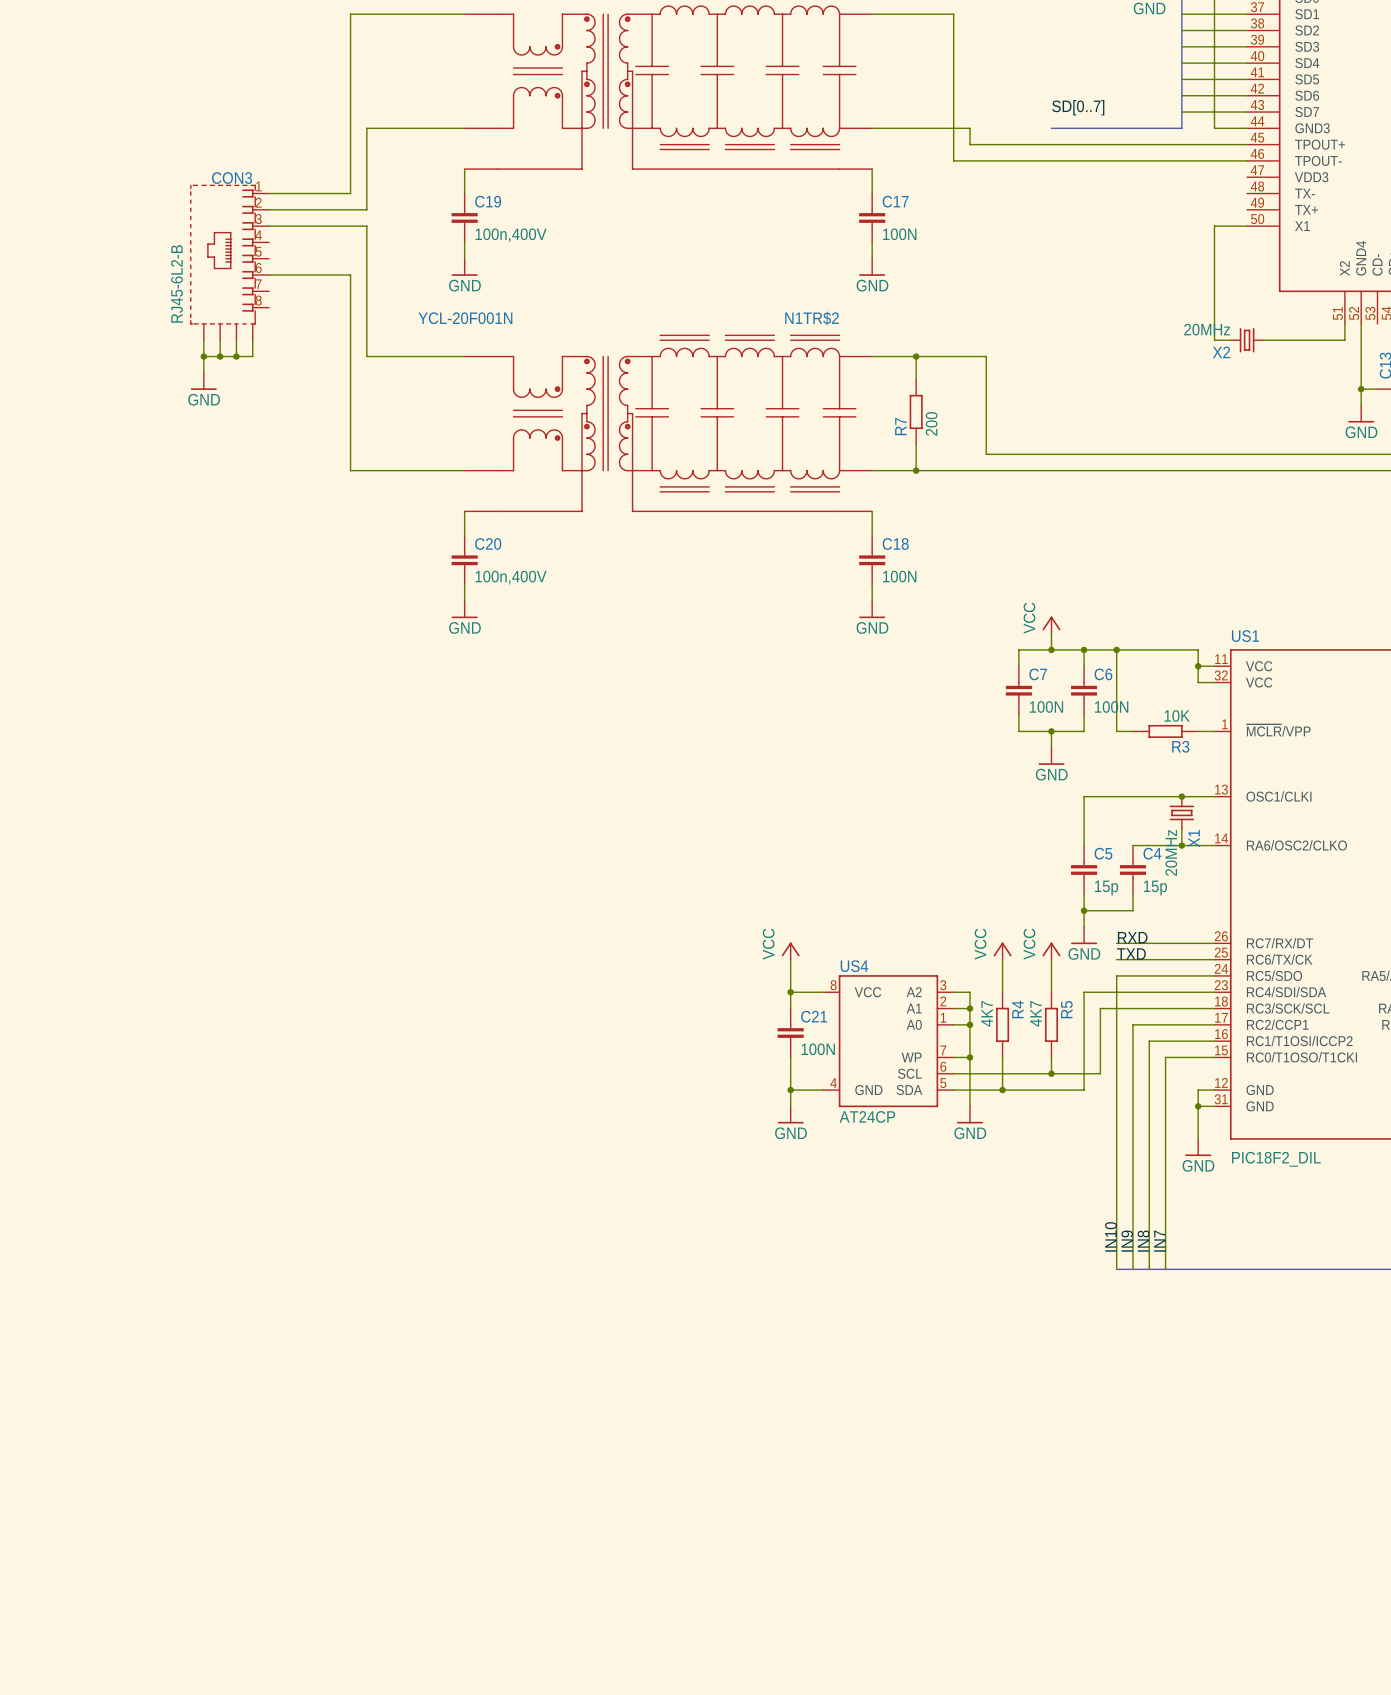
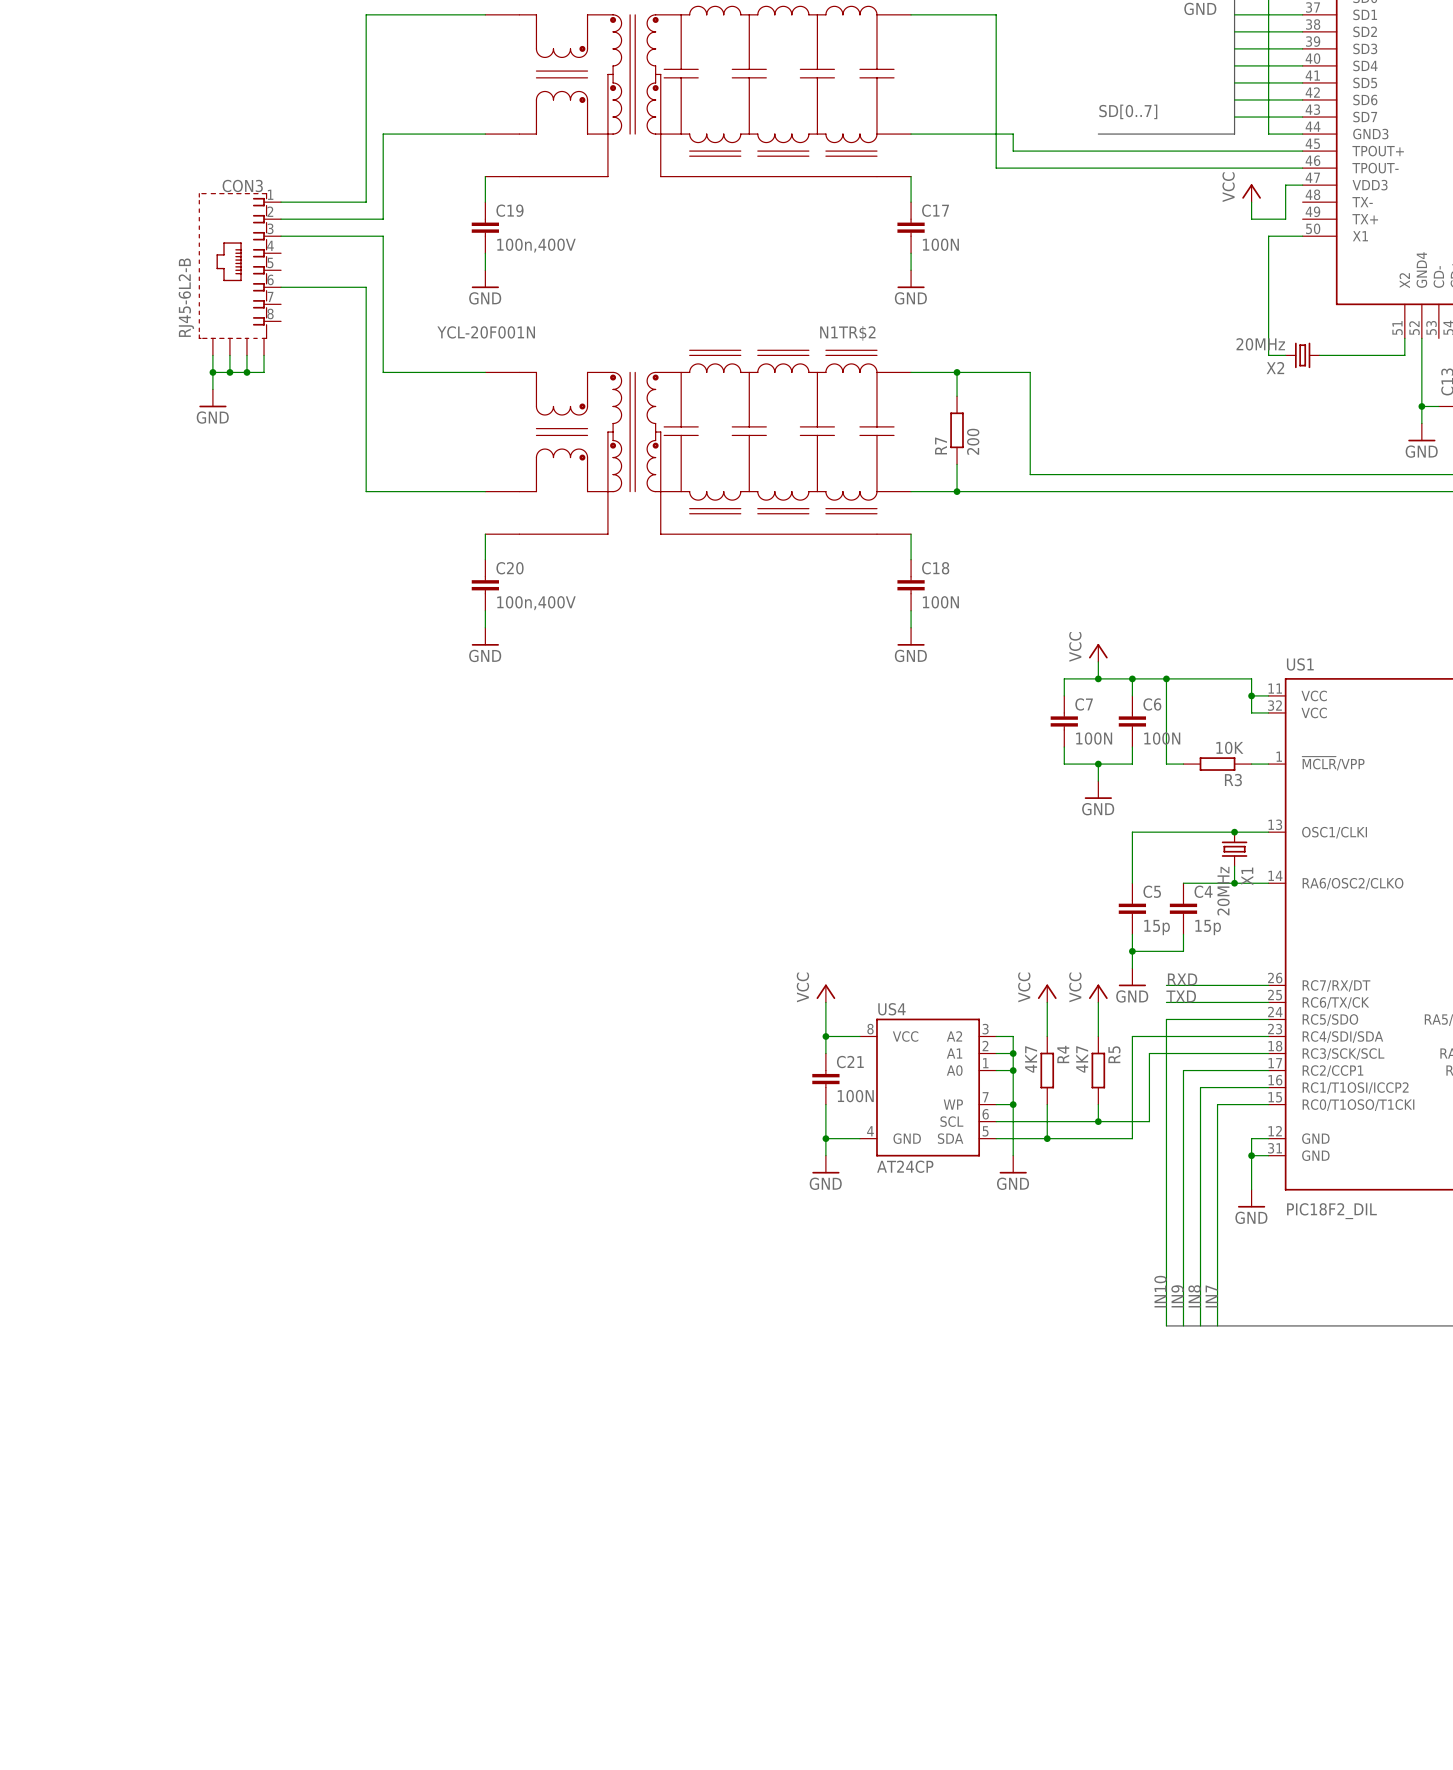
wire: none -> (1302, 185) (1285, 185) (1285, 219) (1251, 219) (1251, 202)
power symbol: none -> VCC (1251, 193)

